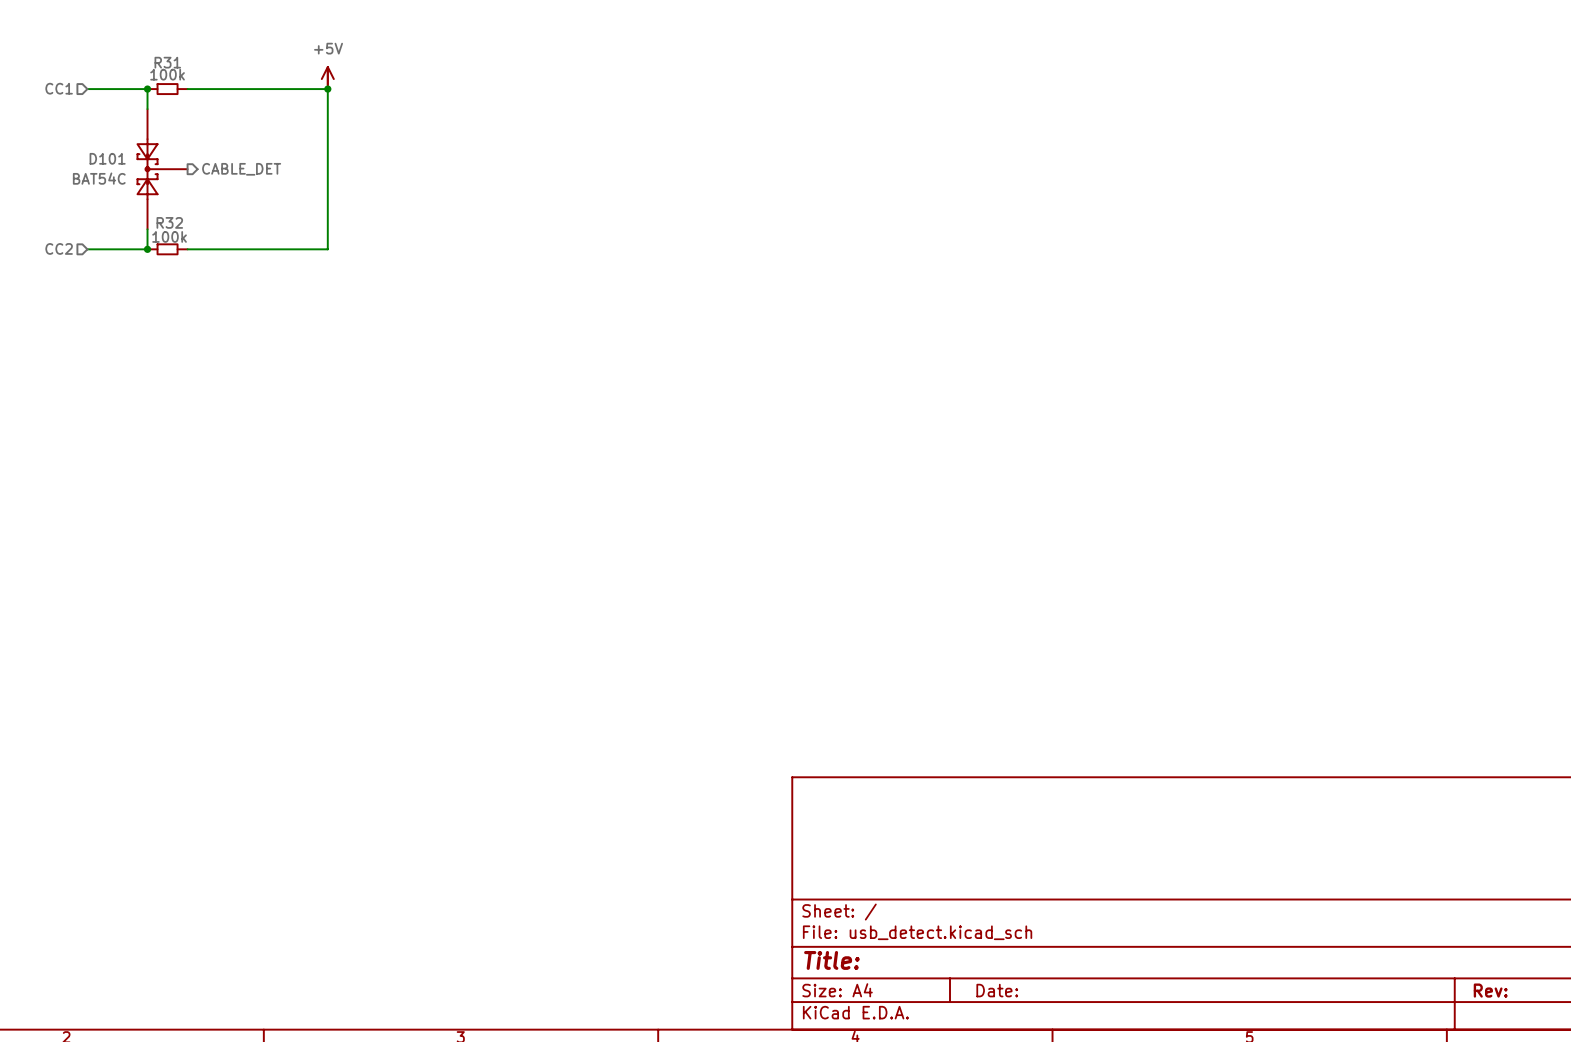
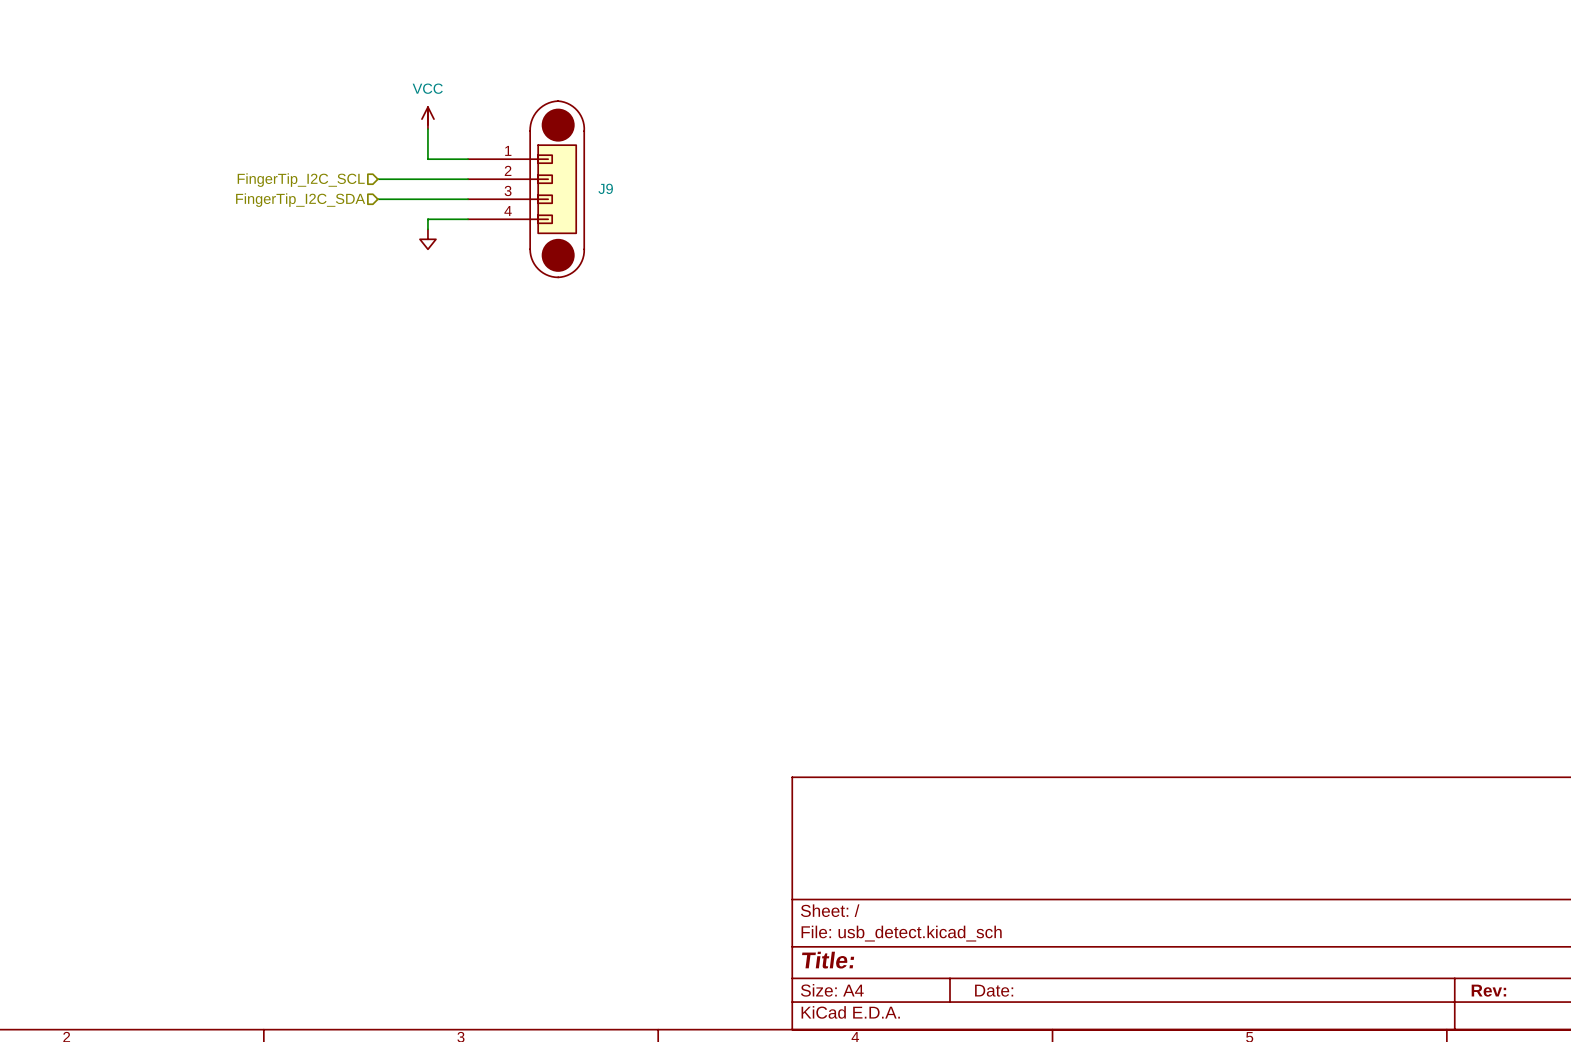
power symbol: +5V (327, 78) -> none
hierarchical label: CC1 (59, 88) -> none
wire: (87, 89) (147, 89) (147, 109) -> none
junction: (147, 89) -> none
R31: 100k (167, 89) -> none
wire: (187, 89) (327, 89) (327, 249) (187, 249) -> none
junction: (327, 89) -> none
power symbol: none -> VCC (427, 118)
wire: none -> (427, 129) (427, 159) (468, 159)
D101: BAT54C (162, 169) -> none
hierarchical label: CABLE_DET (241, 169) -> none
wire: none -> (377, 179) (468, 179)
hierarchical label: none -> FingerTip_I2C_SCL (301, 180)
J9: none -> (526, 189)
wire: none -> (377, 199) (468, 199)
hierarchical label: none -> FingerTip_I2C_SDA (300, 200)
wire: none -> (468, 219) (427, 219) (427, 229)
wire: (147, 229) (147, 249) (87, 249) -> none
power symbol: none -> (427, 239)
hierarchical label: CC2 (59, 248) -> none
junction: (147, 249) -> none
R32: 100k (167, 249) -> none

